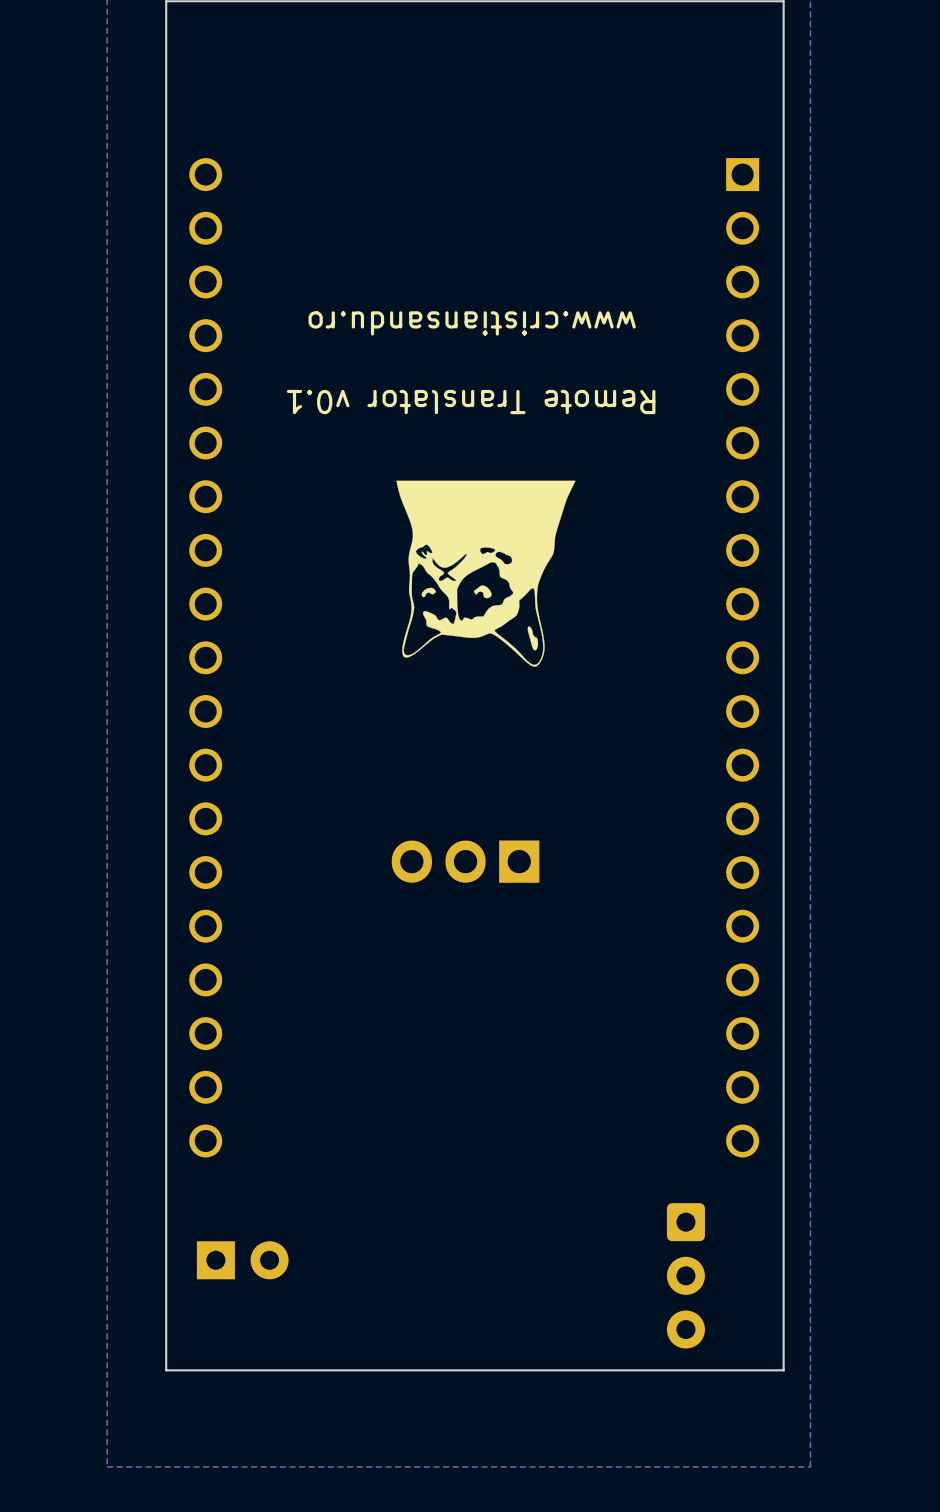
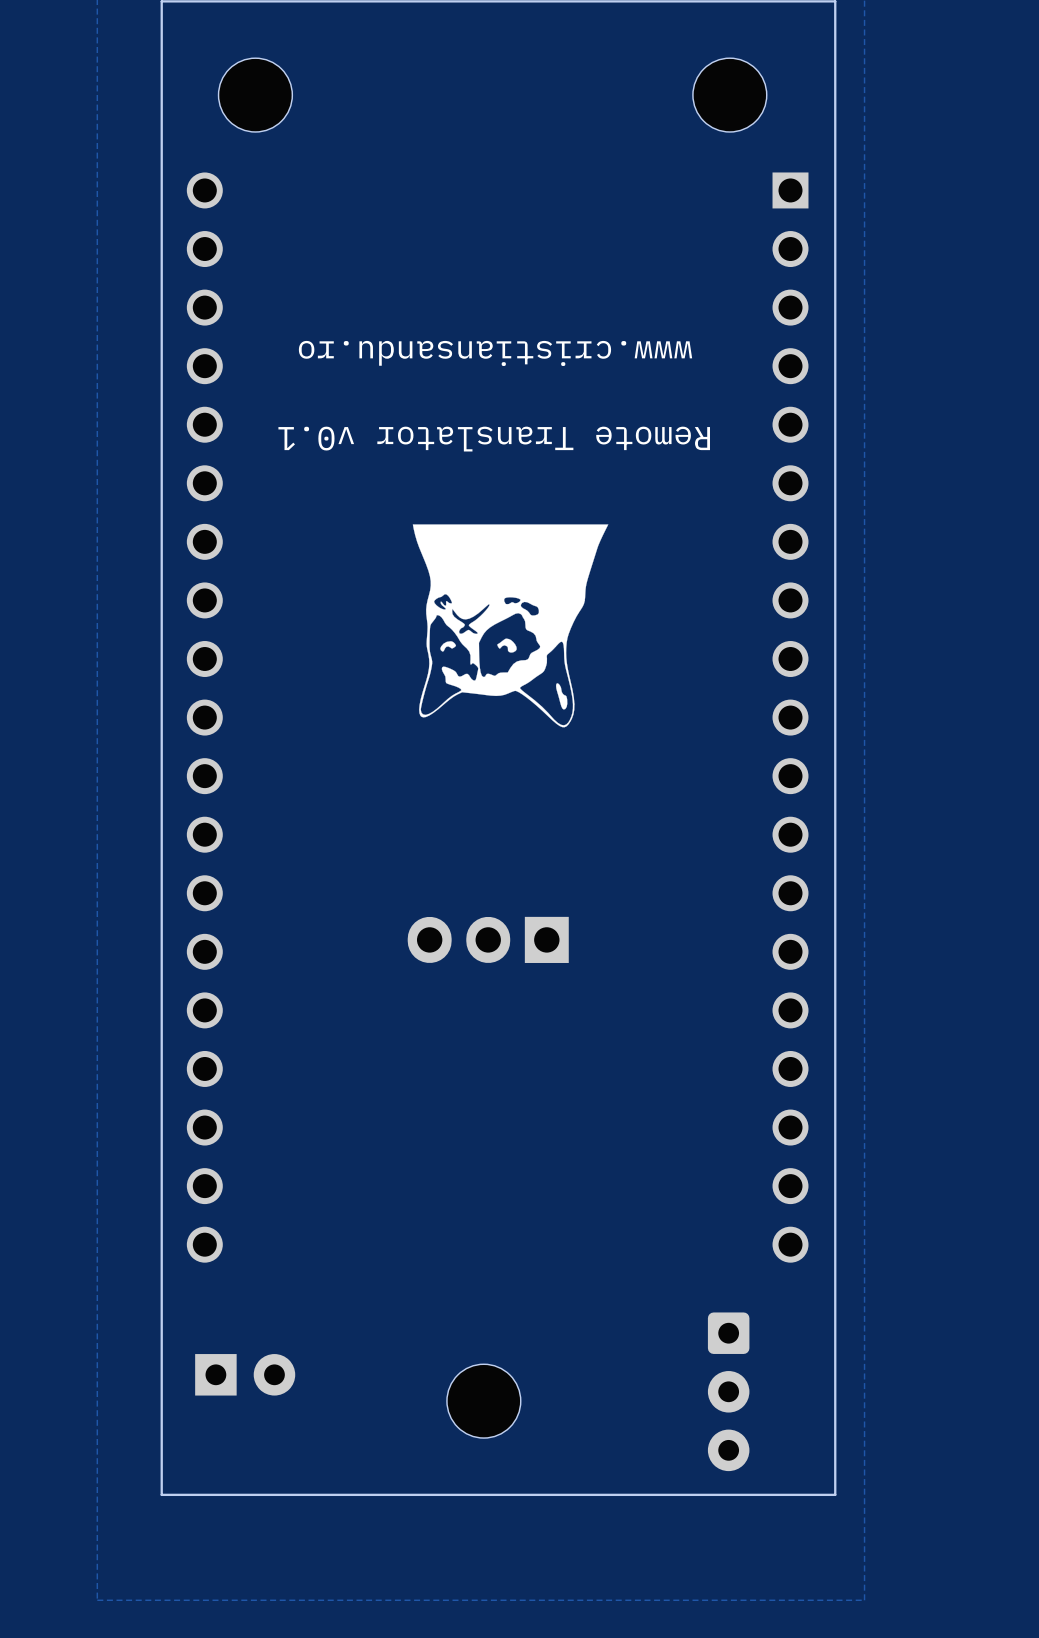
part: none -> (255, 95)
part: none -> (729, 95)
part: none -> (483, 1401)

